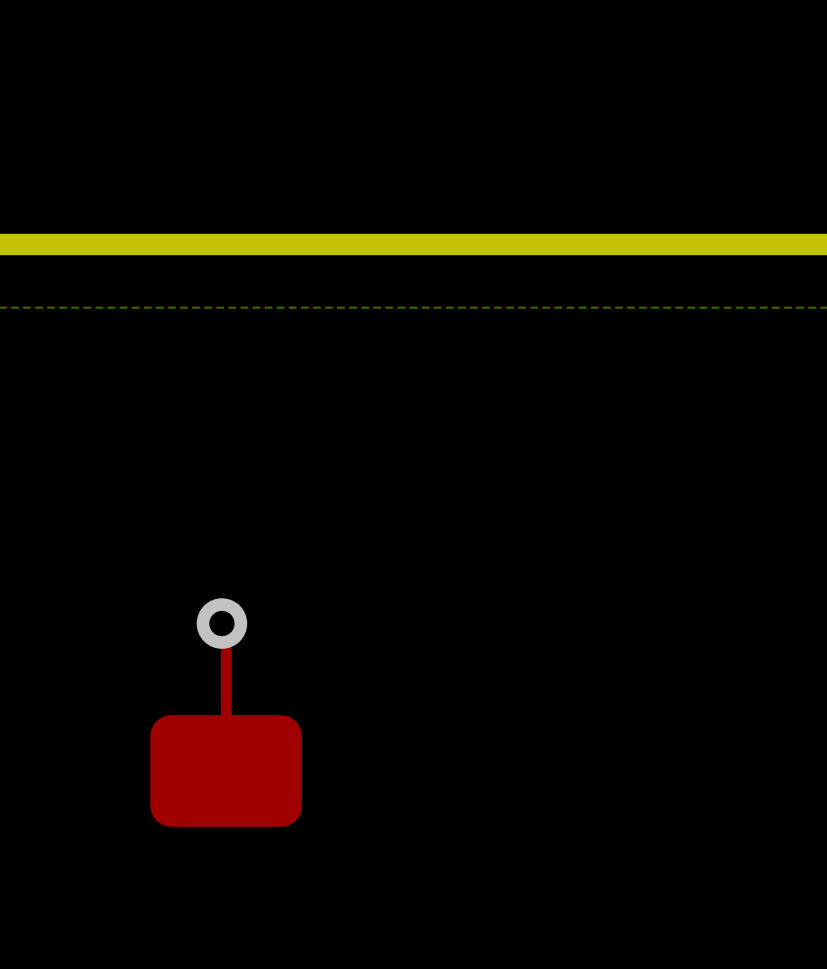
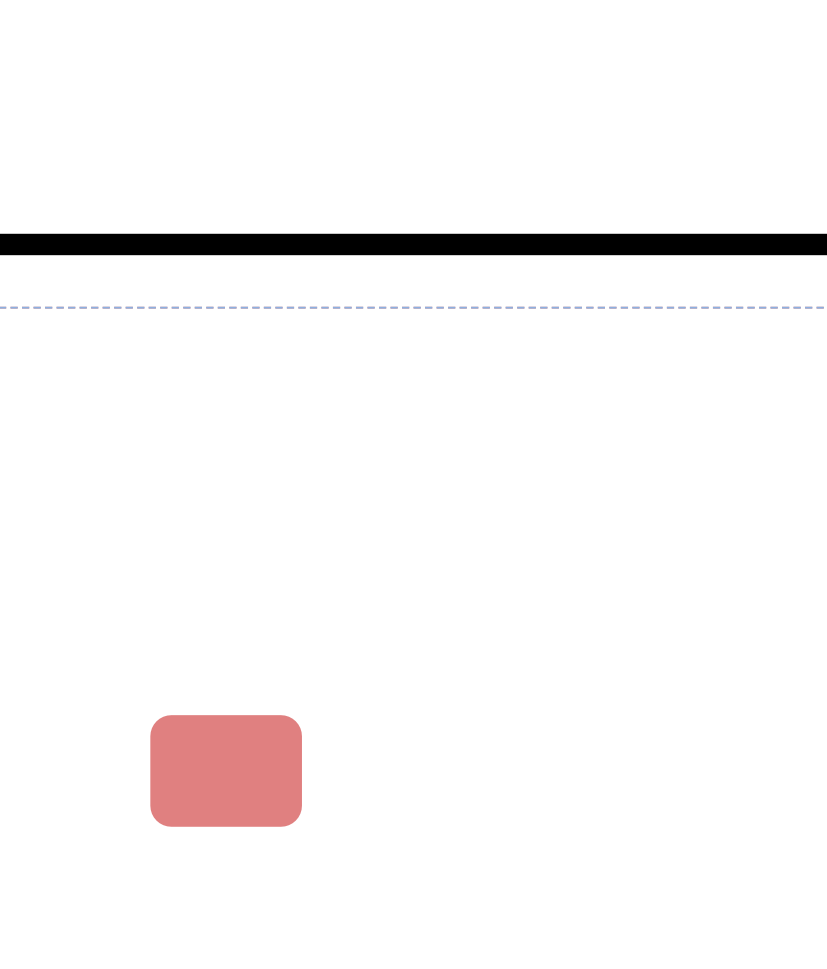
top track: (221, 623) (226, 627) (226, 770) -> none
via: (221, 623) -> none

